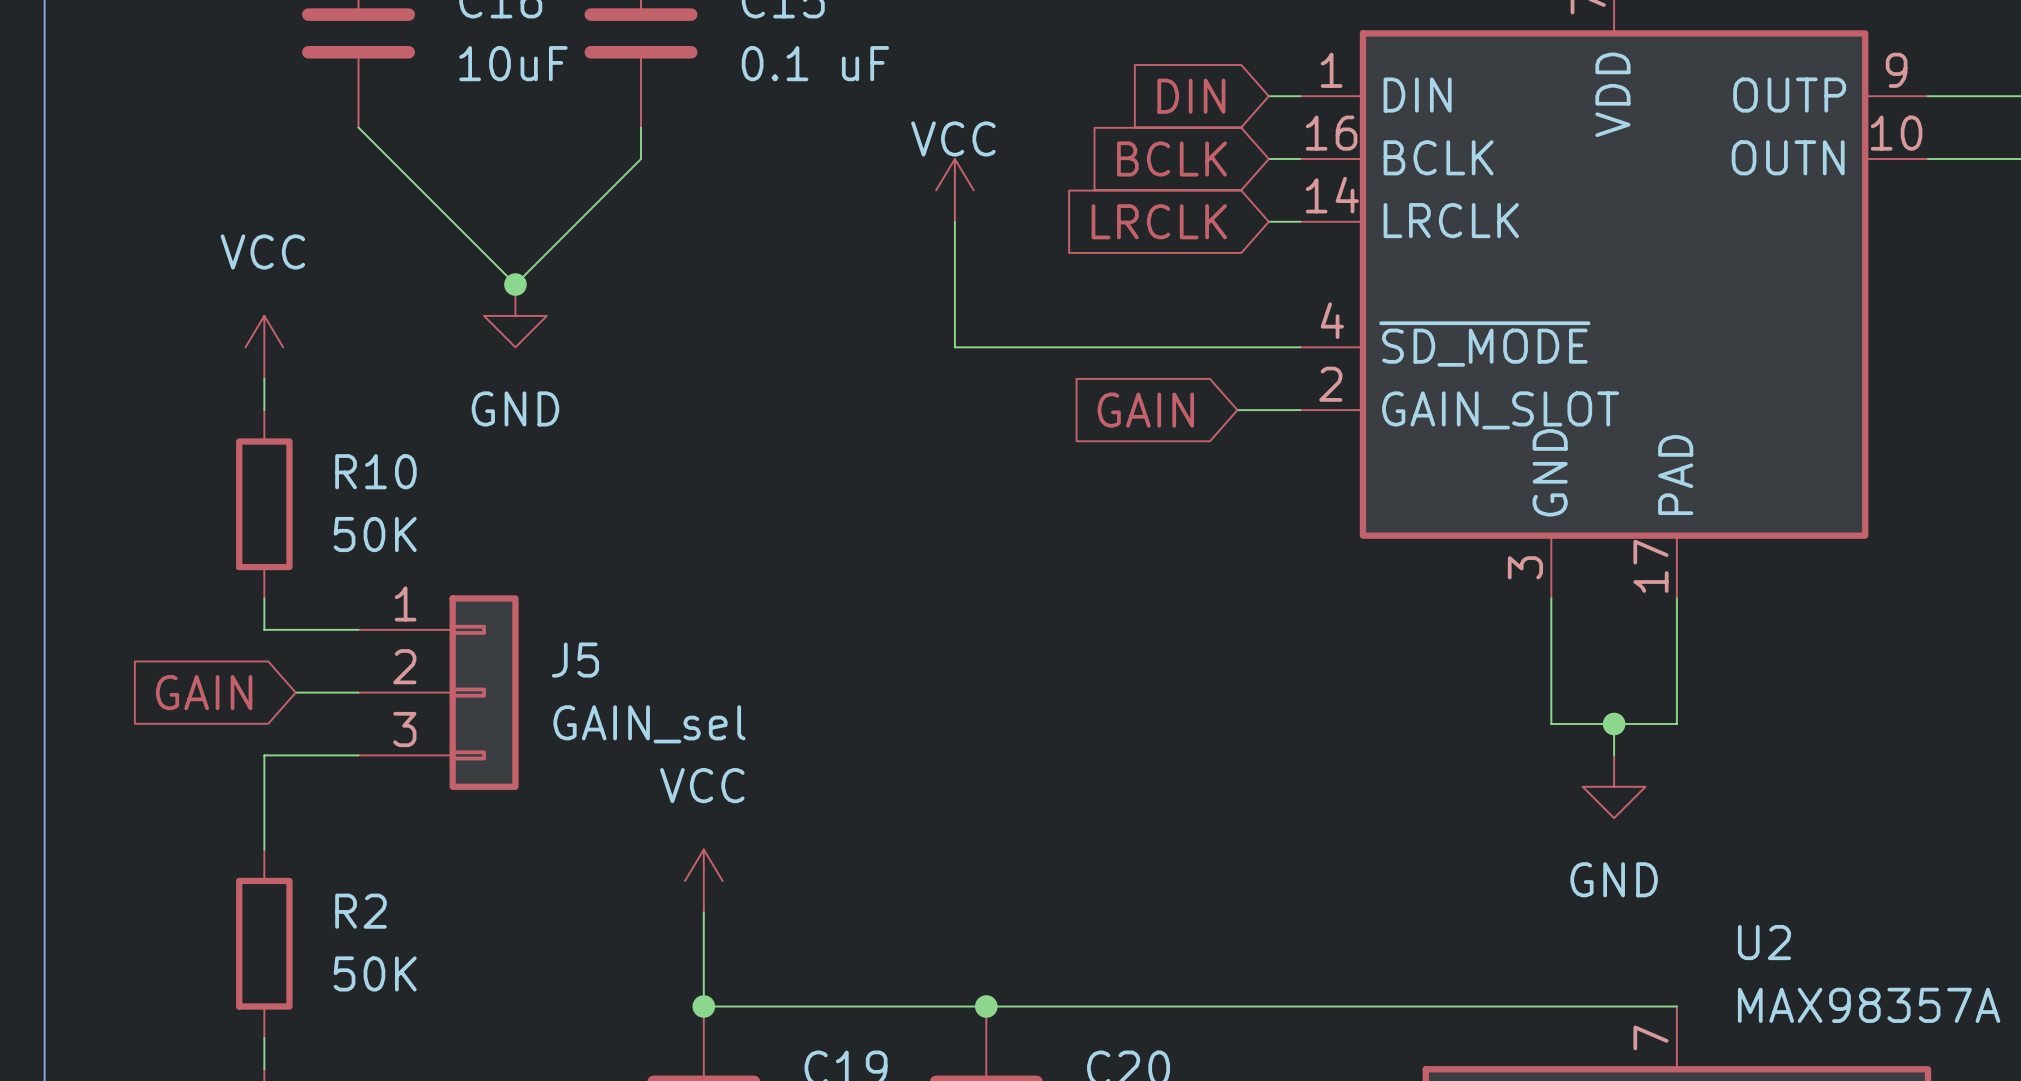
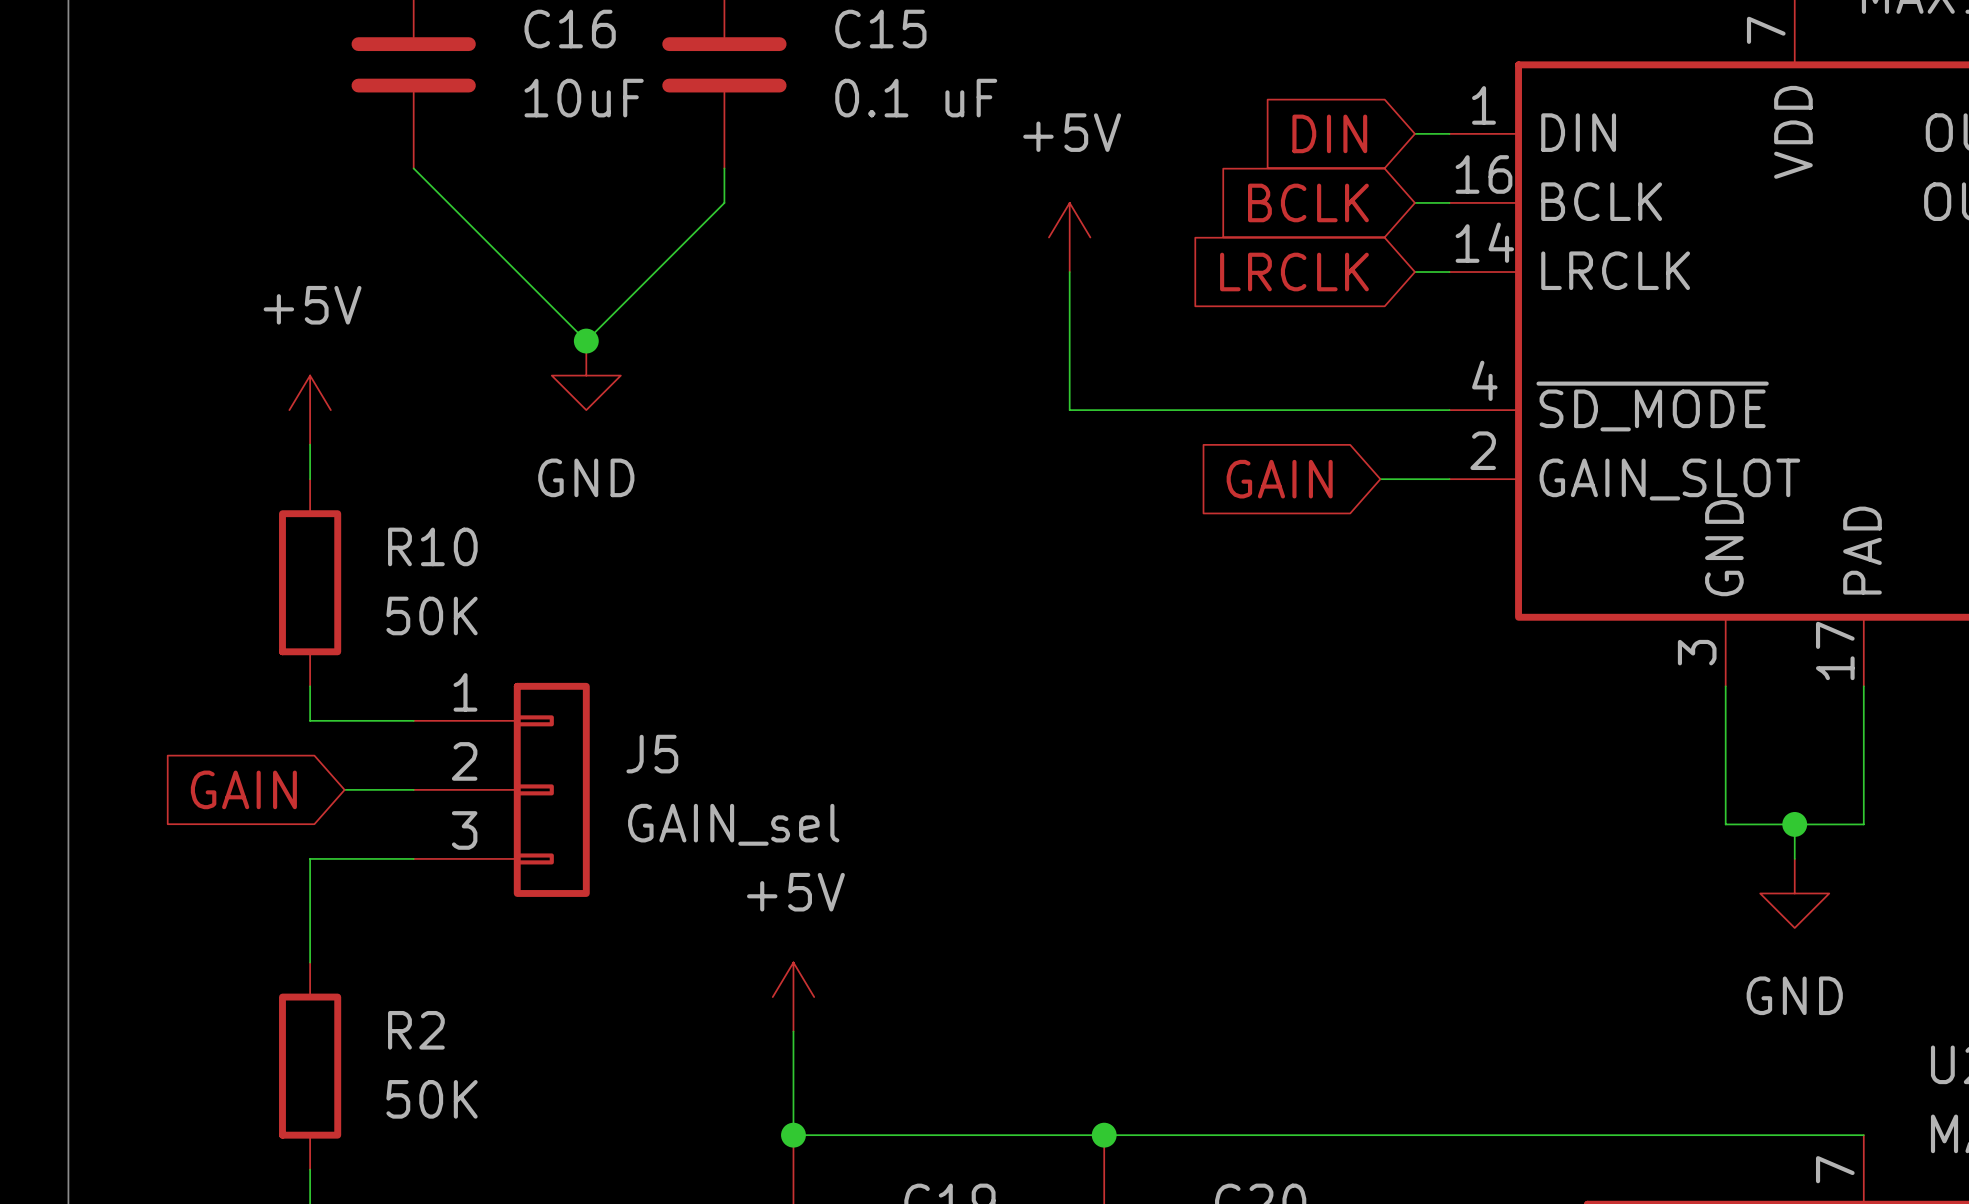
power symbol: VCC (954, 190) -> +5V (1069, 237)
power symbol: VCC (264, 347) -> +5V (310, 410)
power symbol: VCC (703, 880) -> +5V (793, 997)

